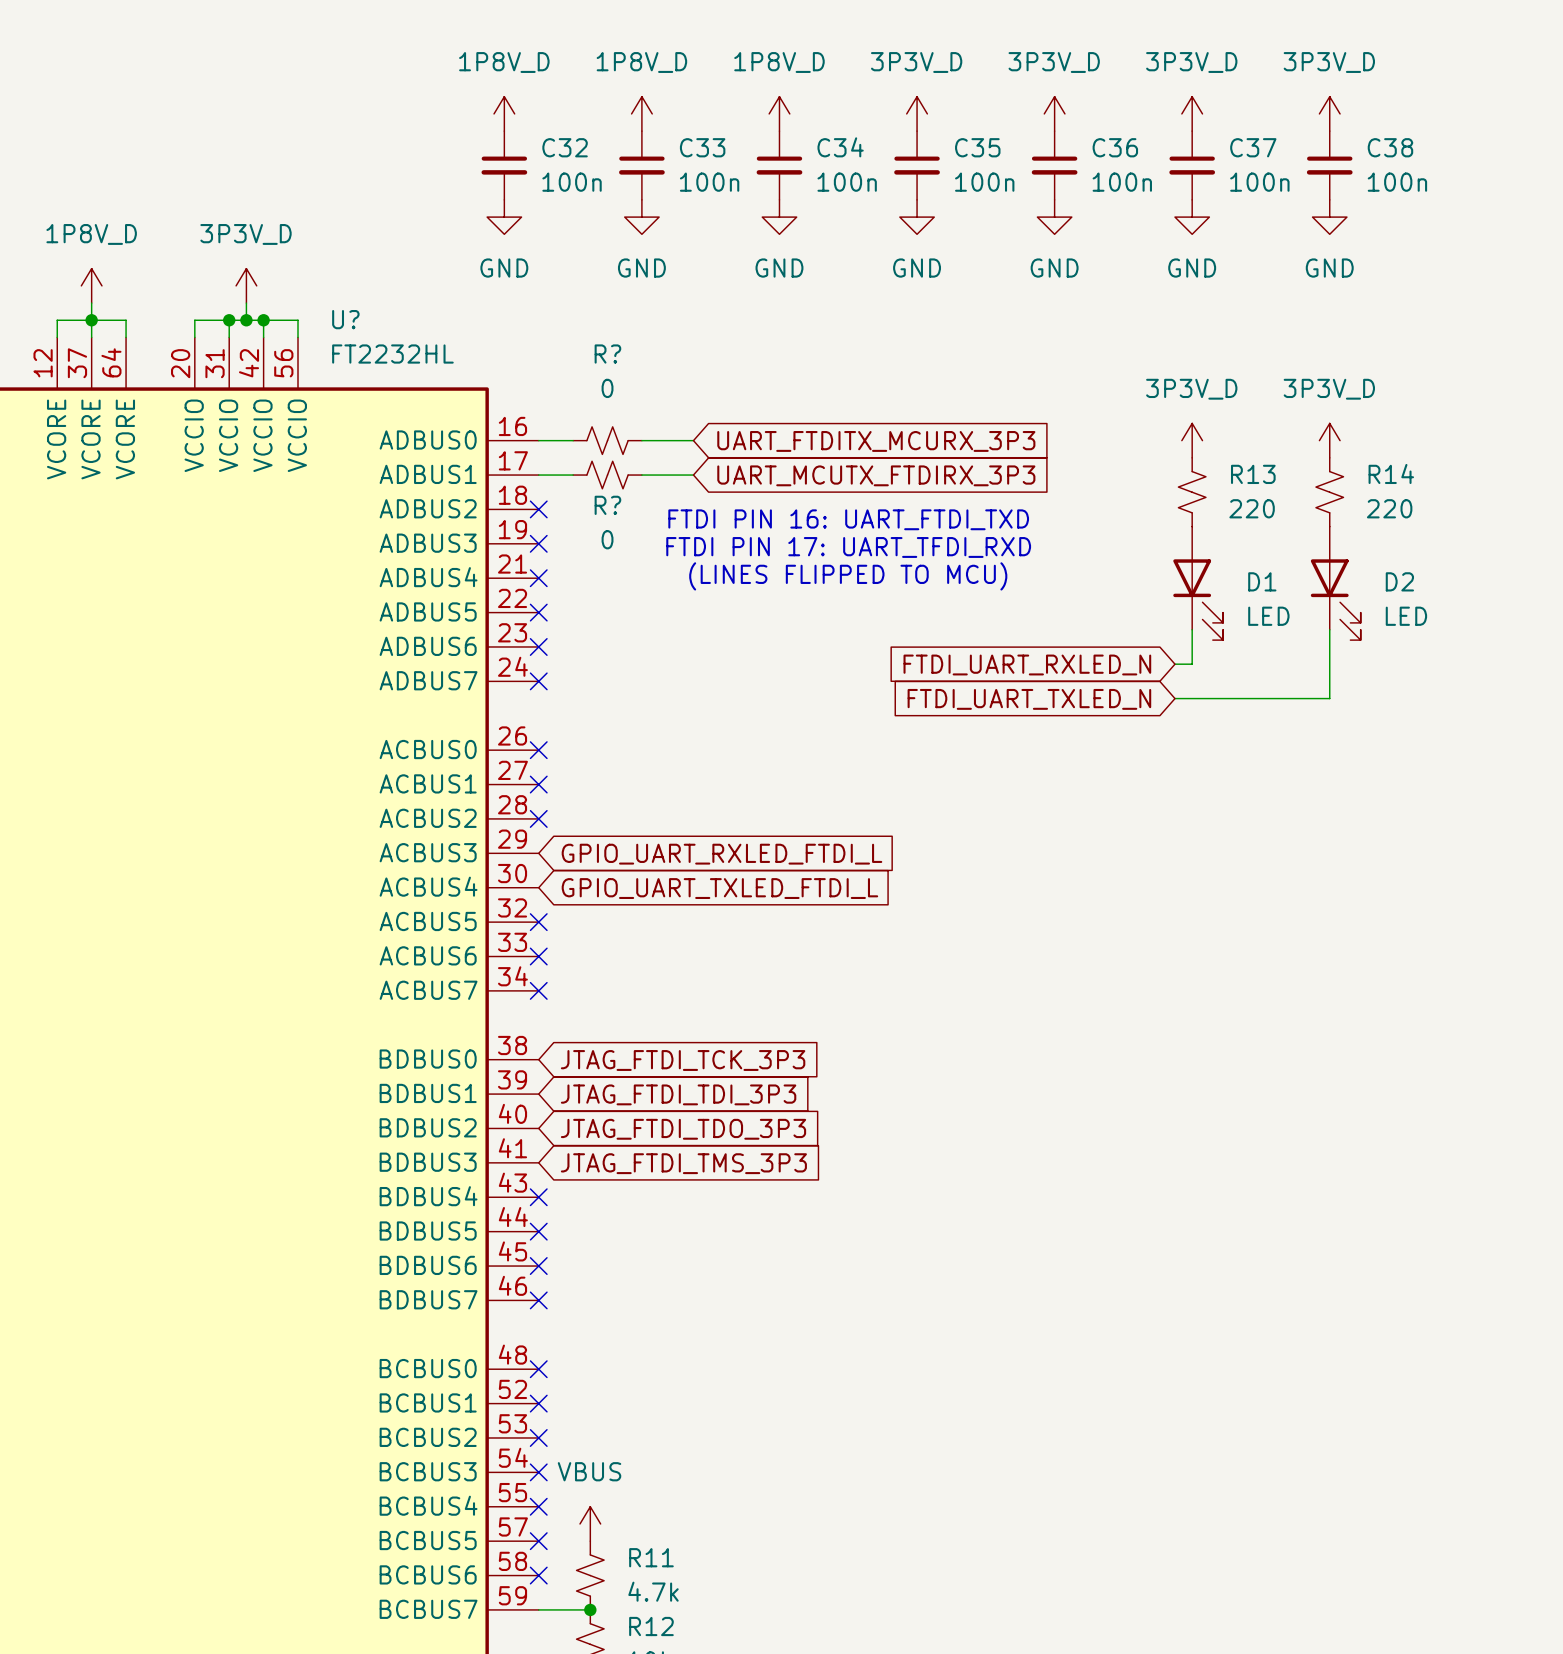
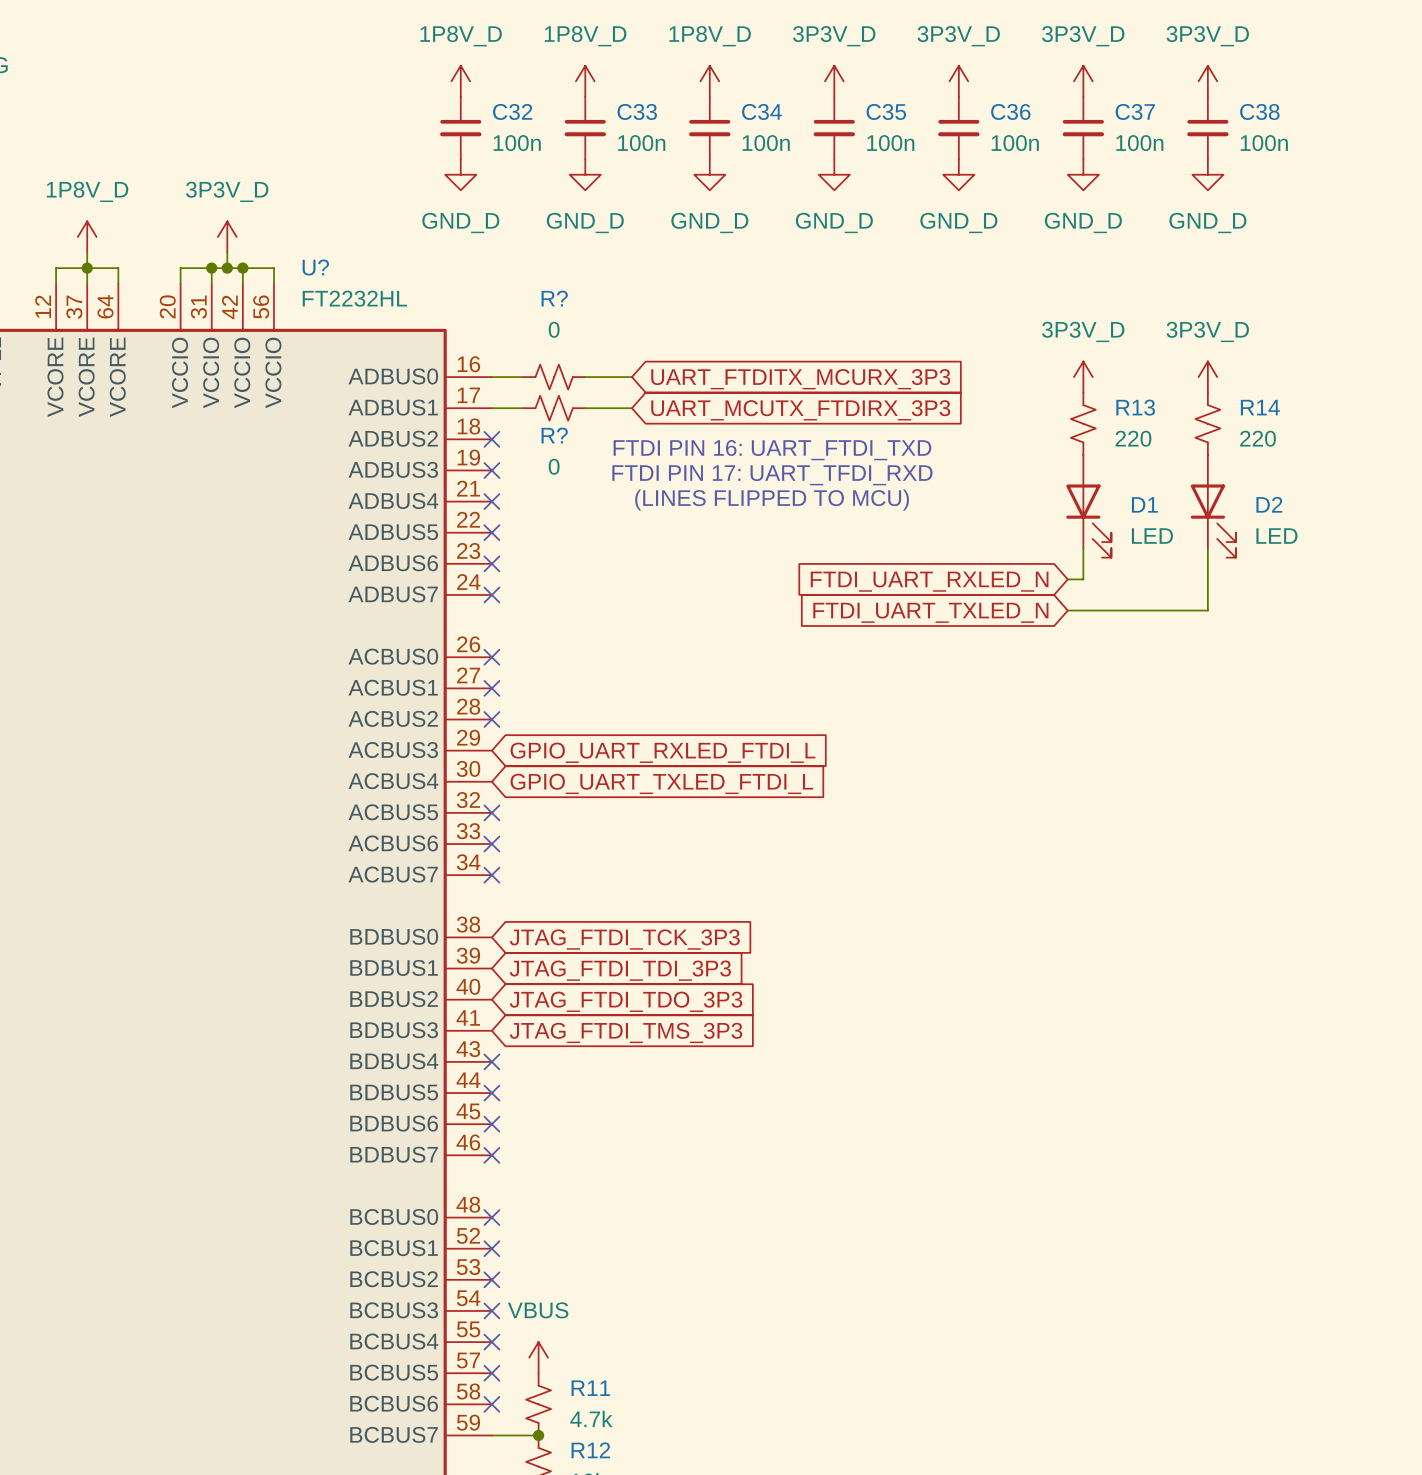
power symbol: GND (504, 217) -> GND_D (460, 174)
power symbol: GND (641, 217) -> GND_D (585, 174)
power symbol: GND (779, 217) -> GND_D (709, 174)
power symbol: GND (917, 217) -> GND_D (834, 174)
power symbol: GND (1054, 217) -> GND_D (958, 174)
power symbol: GND (1192, 217) -> GND_D (1083, 174)
power symbol: GND (1329, 217) -> GND_D (1207, 174)

